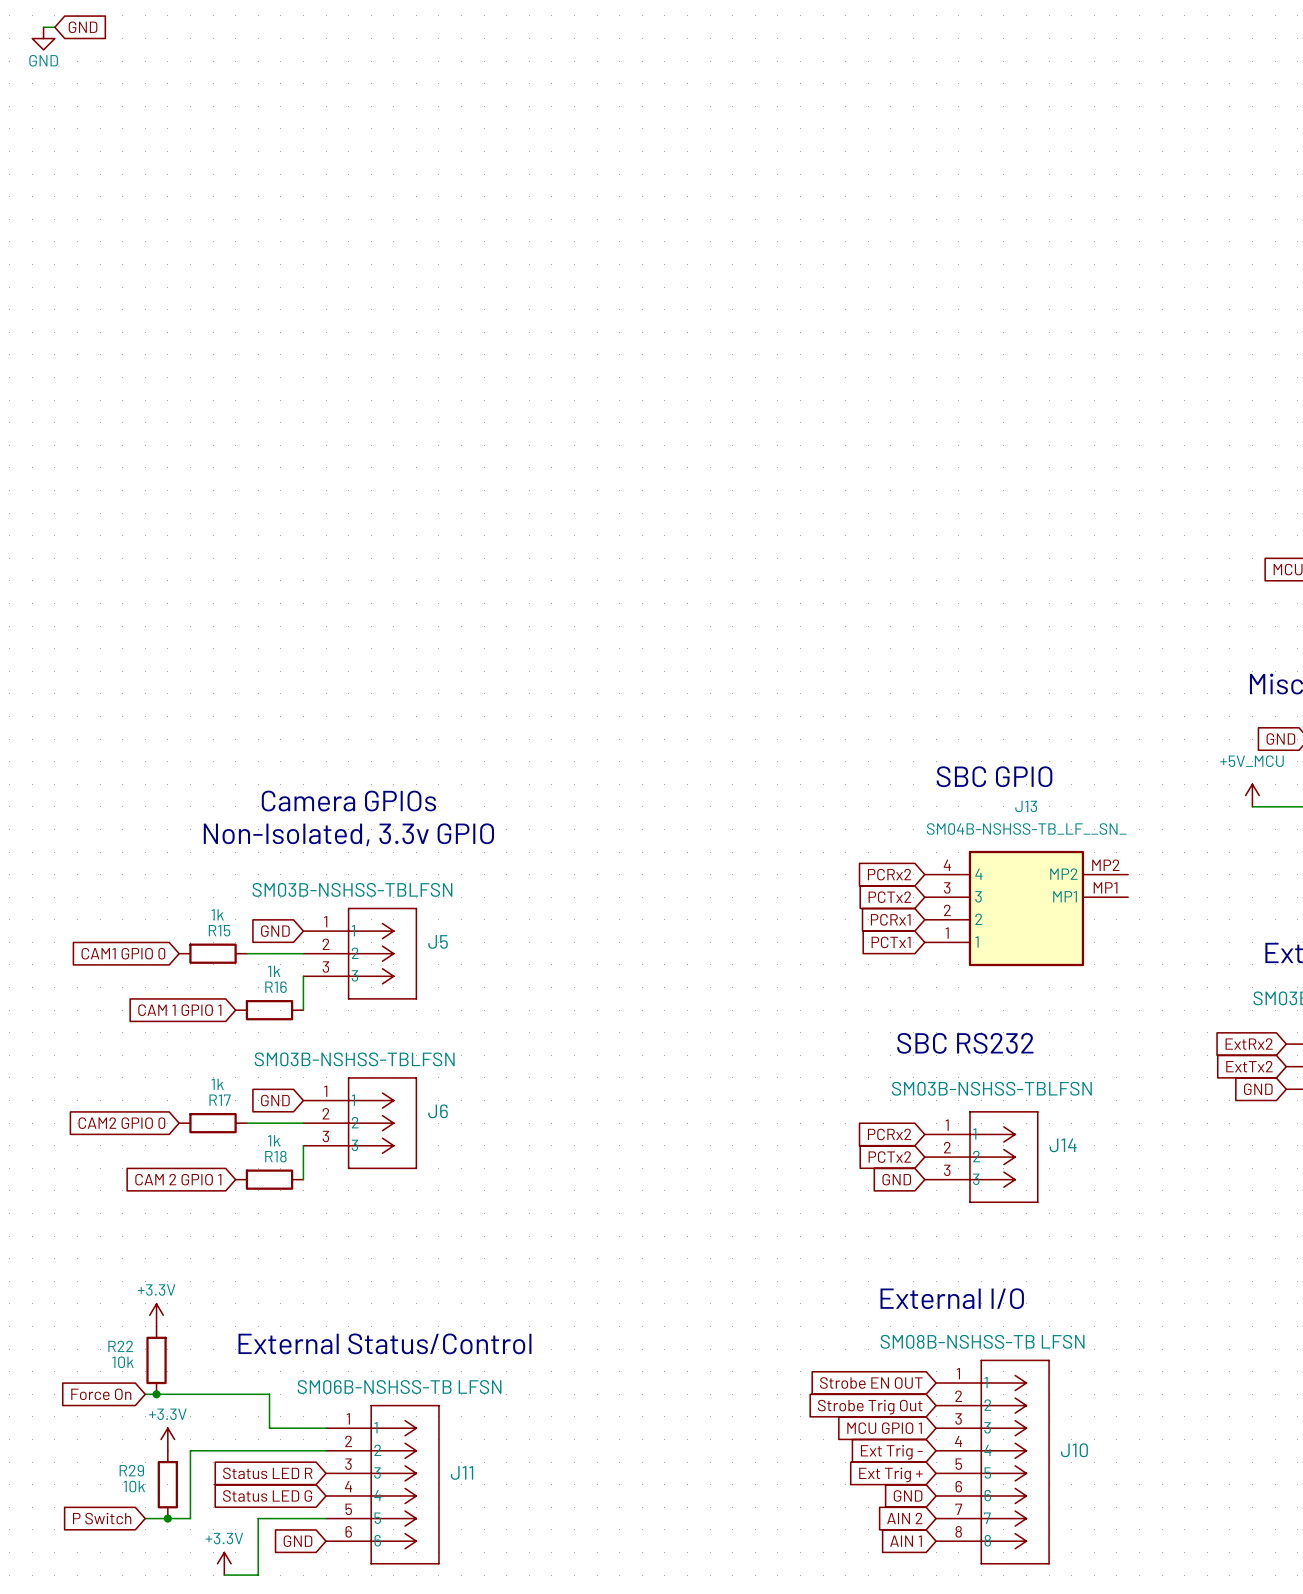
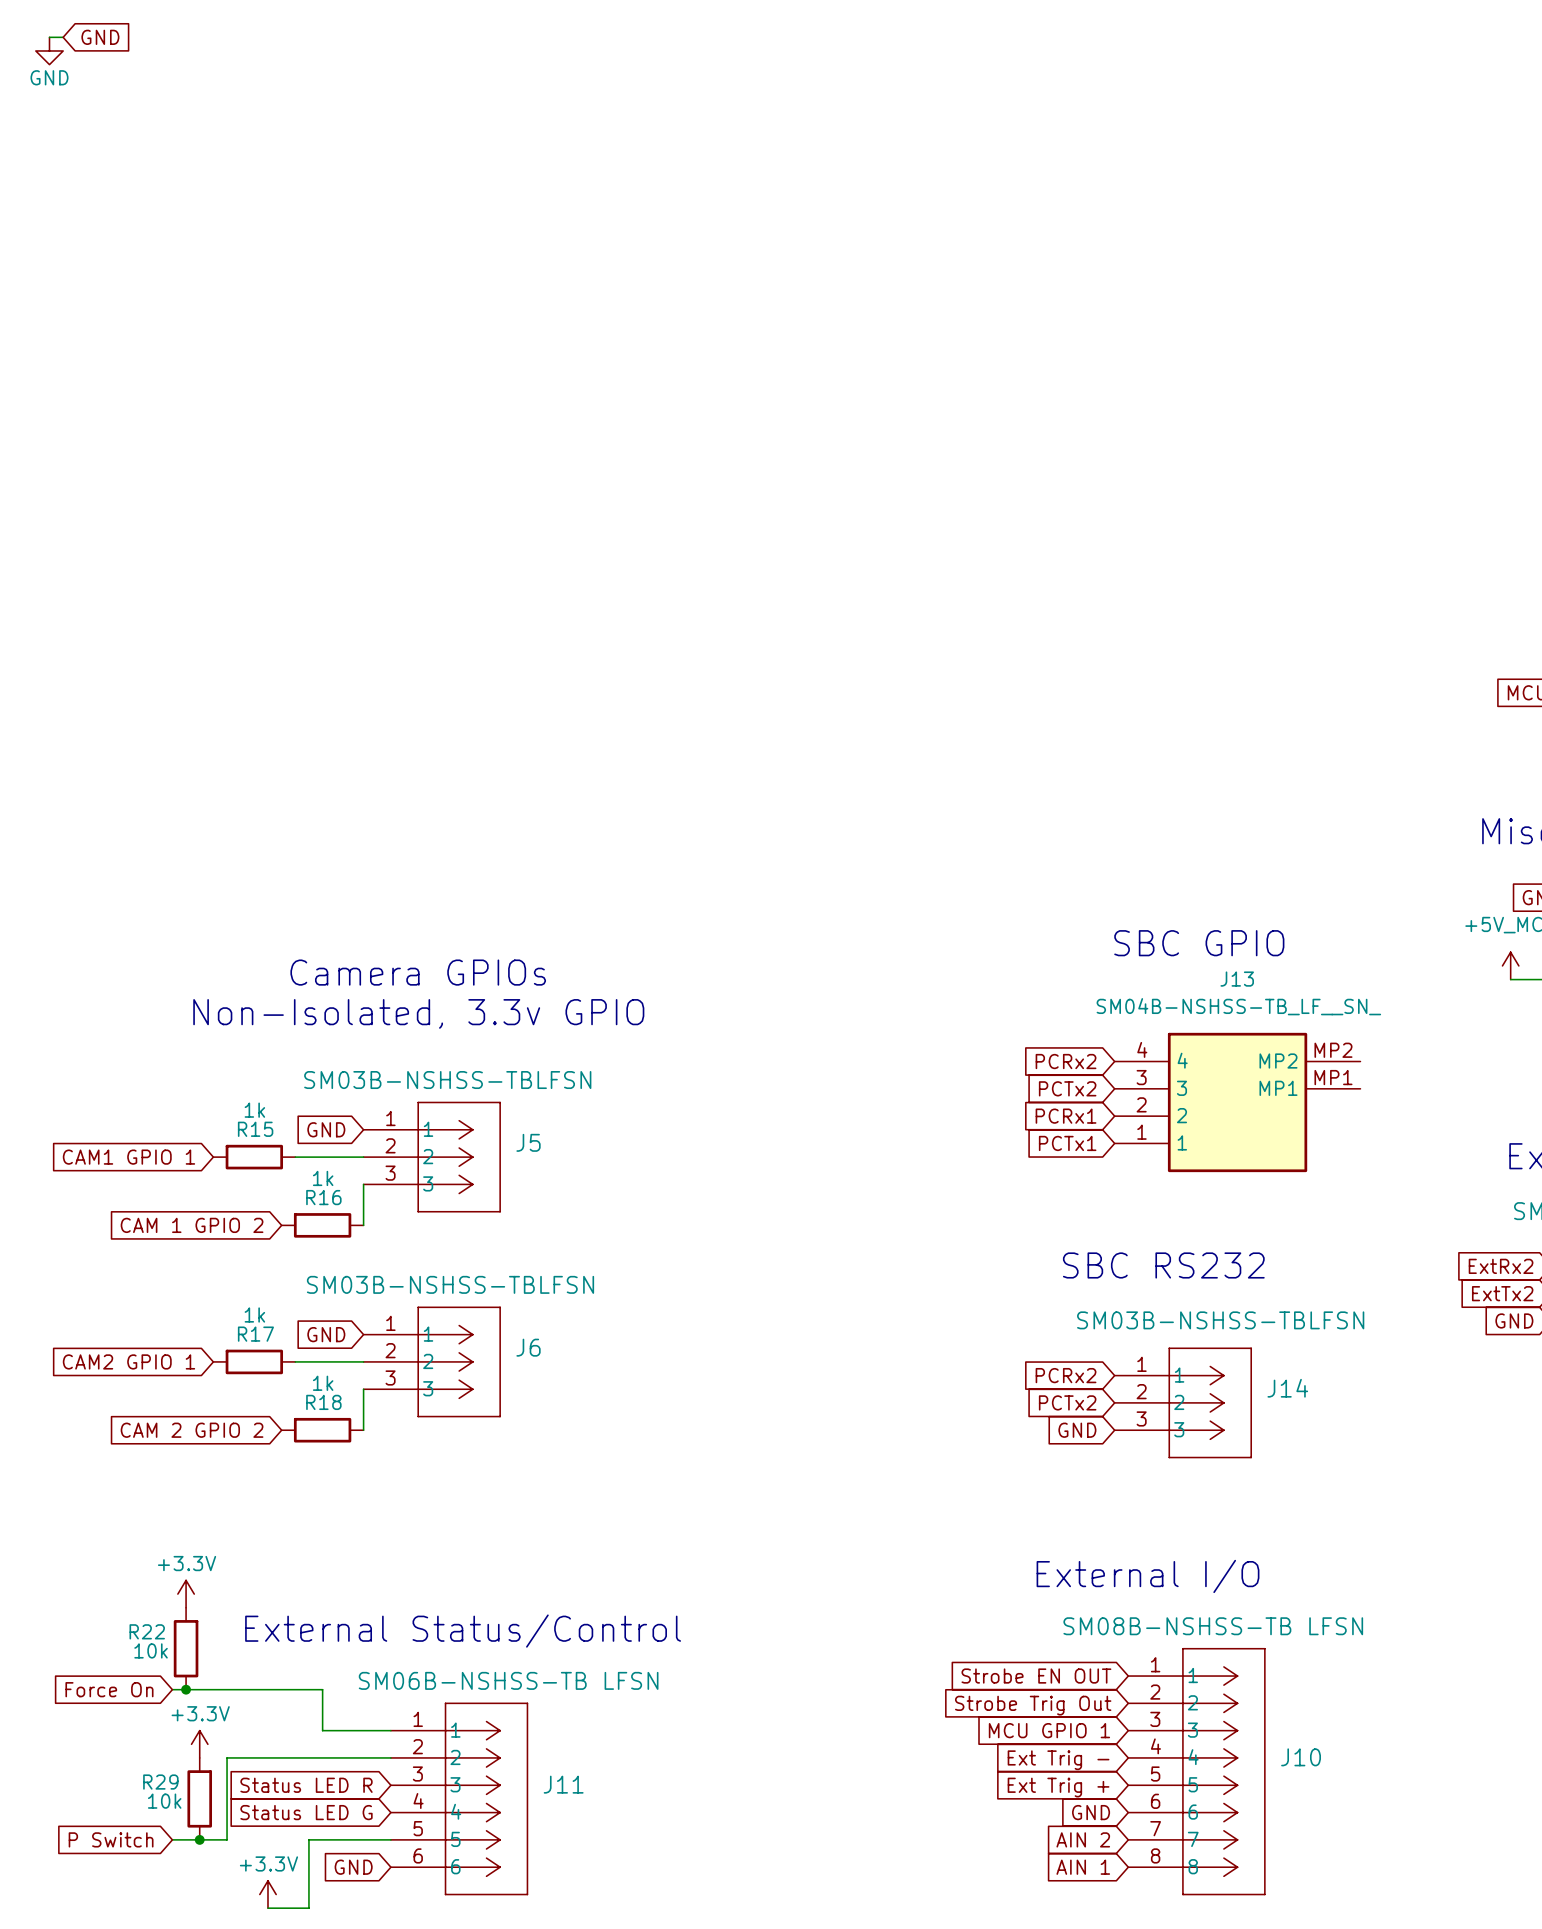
global label: CAM1 GPIO 0 (123, 953) -> CAM1 GPIO 1 (128, 1157)
global label: CAM 1 GPIO 1 (179, 1010) -> CAM 1 GPIO 2 (192, 1225)
global label: CAM2 GPIO 0 (121, 1123) -> CAM2 GPIO 1 (128, 1361)
global label: CAM 2 GPIO 1 (178, 1179) -> CAM 2 GPIO 2 (192, 1430)

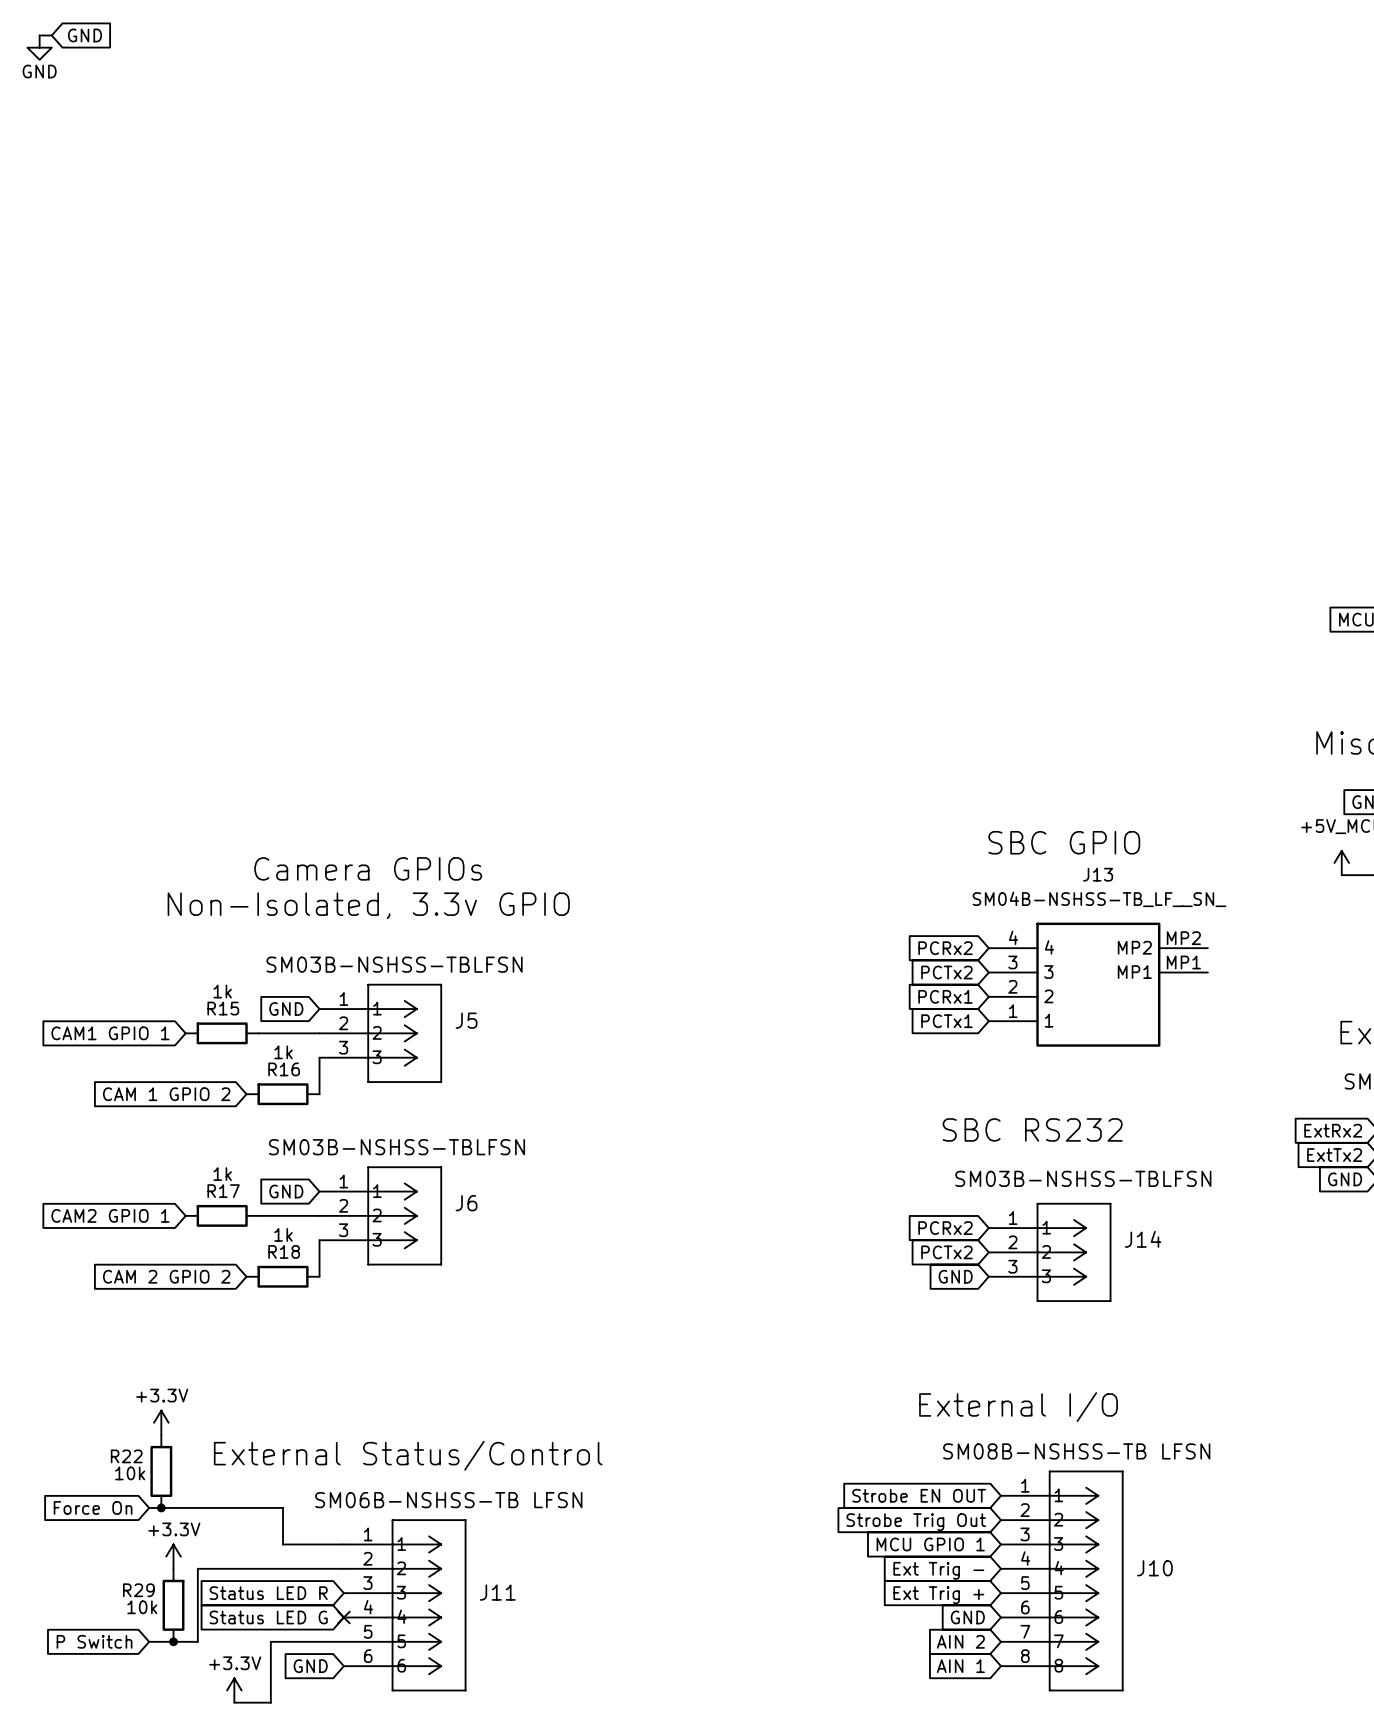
no-connect mark: none -> (343, 1617)

